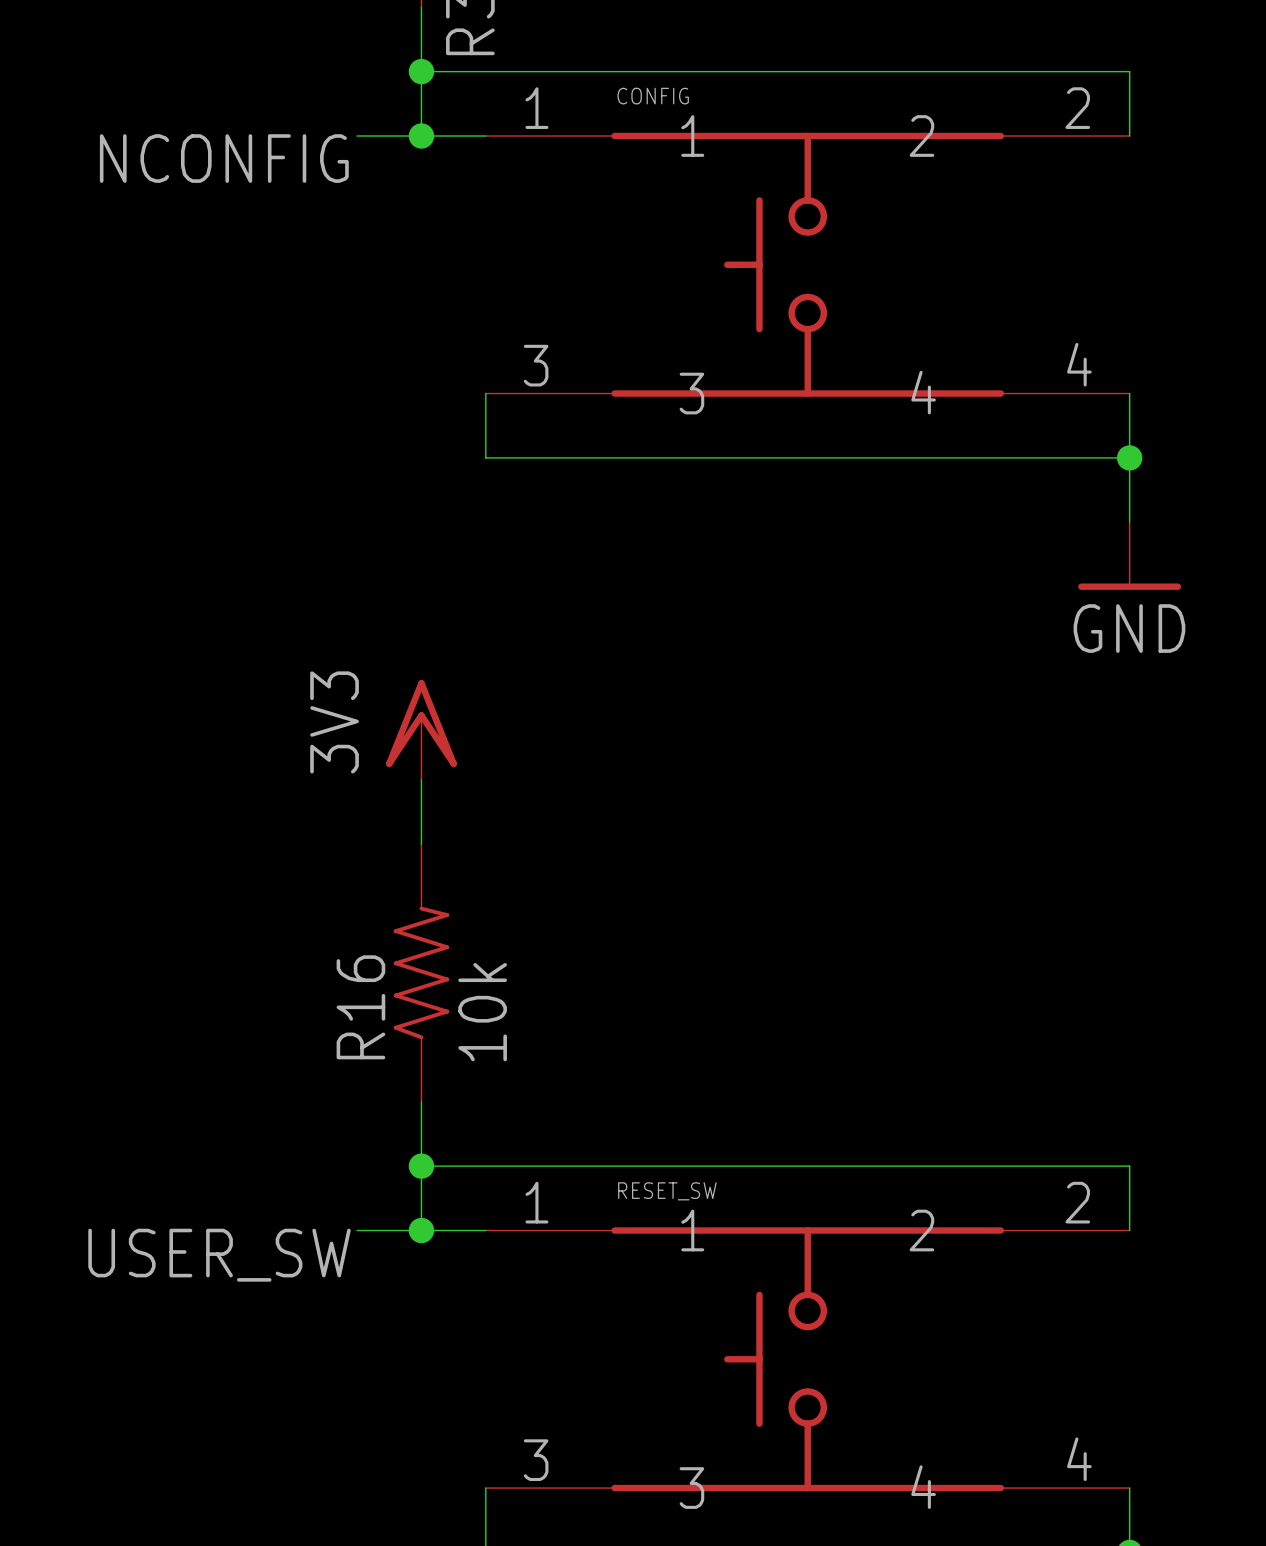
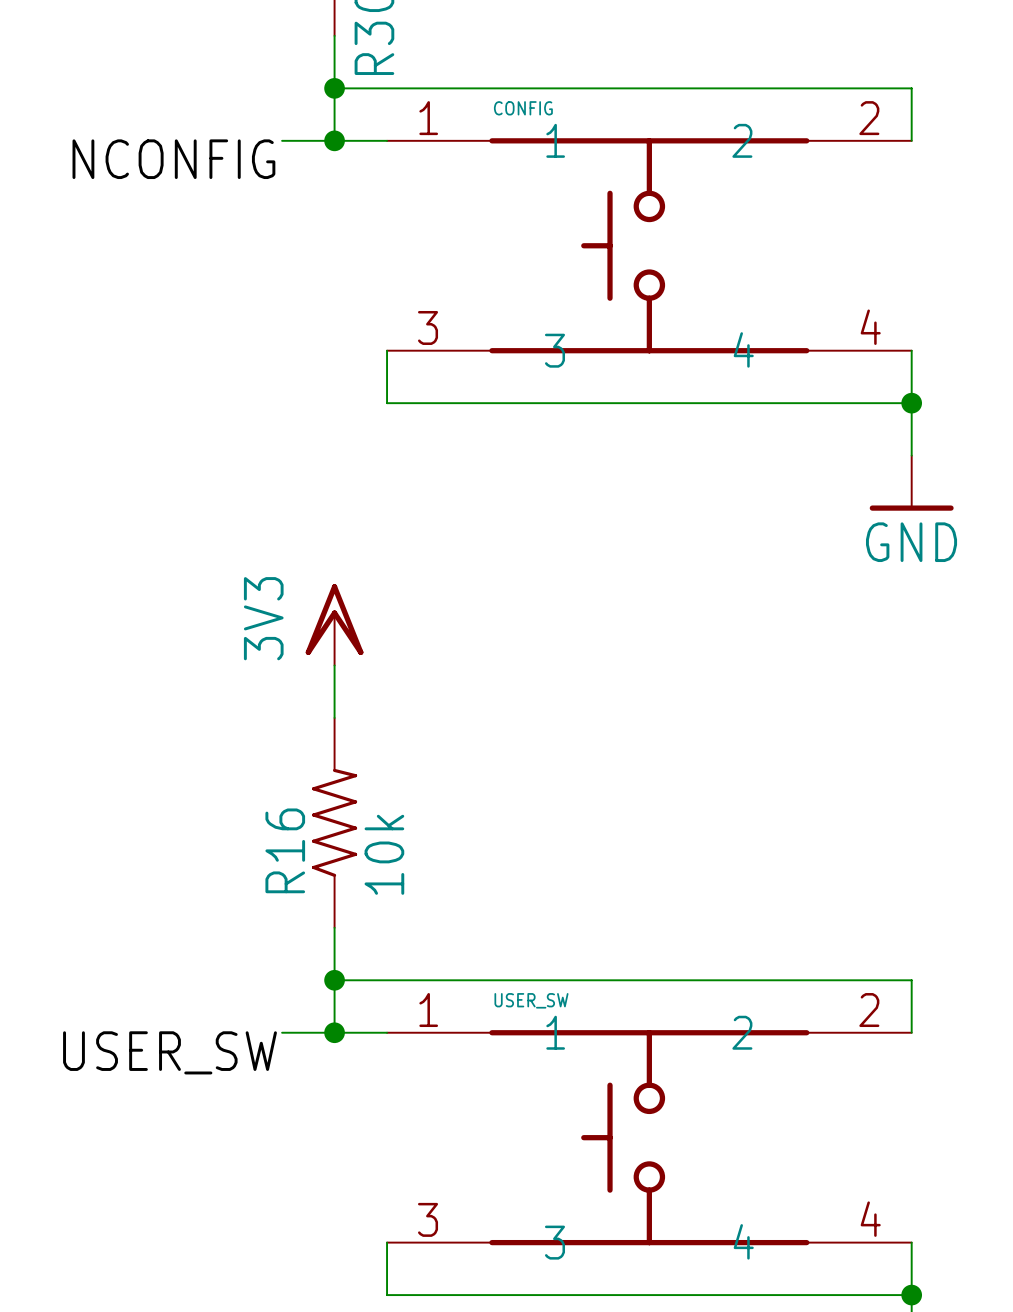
RESET_SW name: RESET_SW (667, 1191) -> USER_SW (531, 1000)

